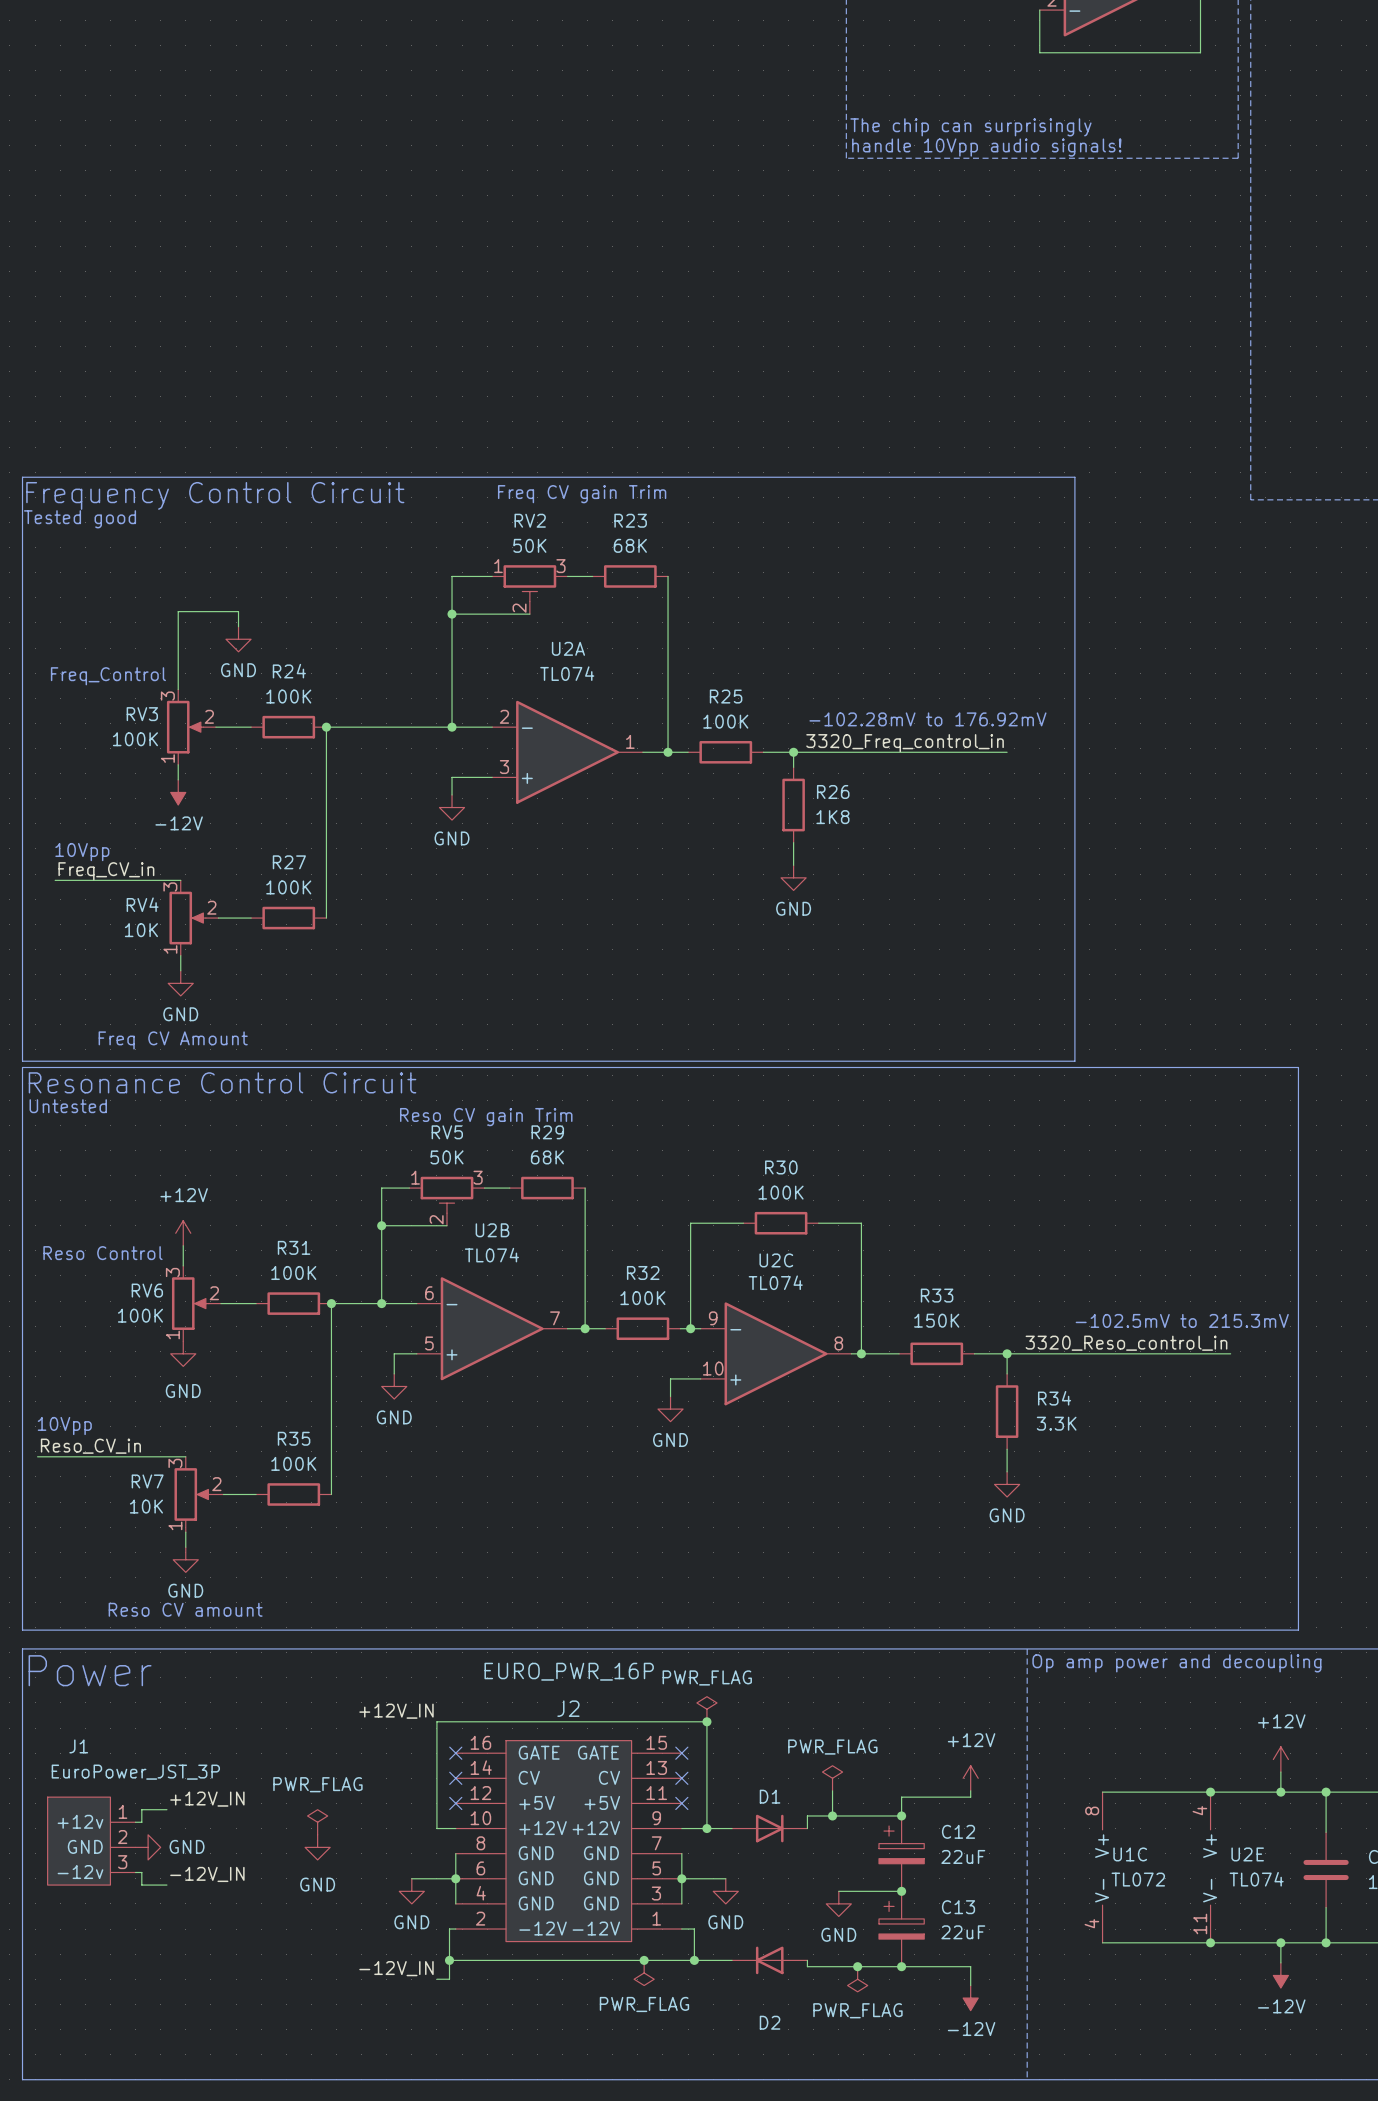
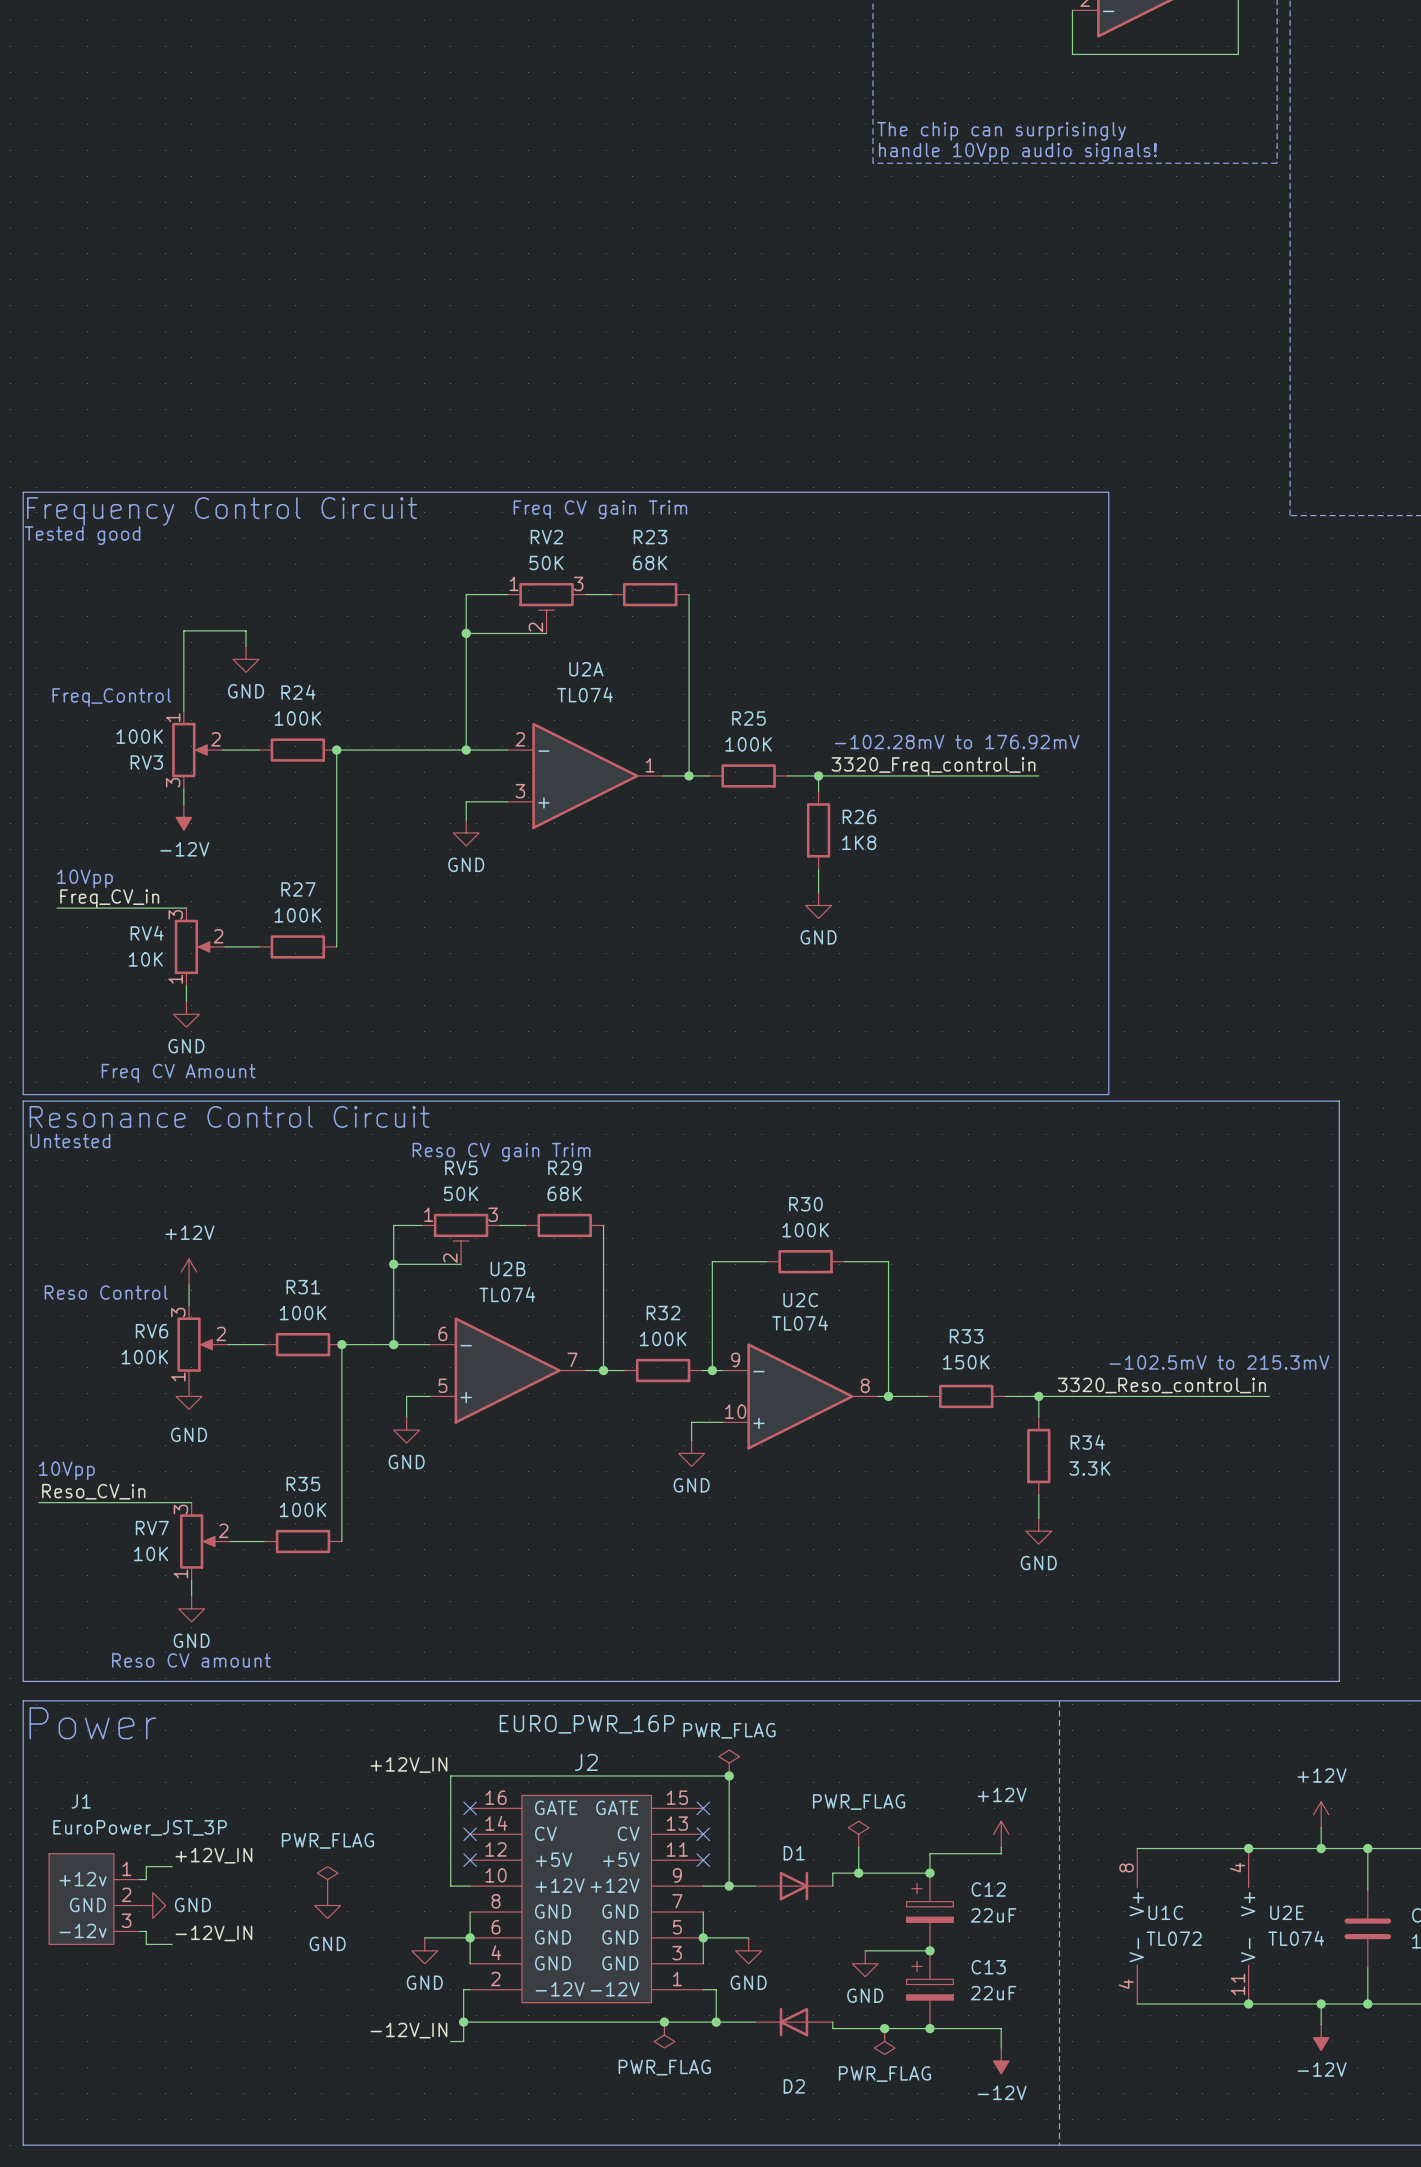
RV3 flip: as is (185, 727) -> up-down (190, 750)
text: Op amp power and decoupling (1176, 1663) -> none

